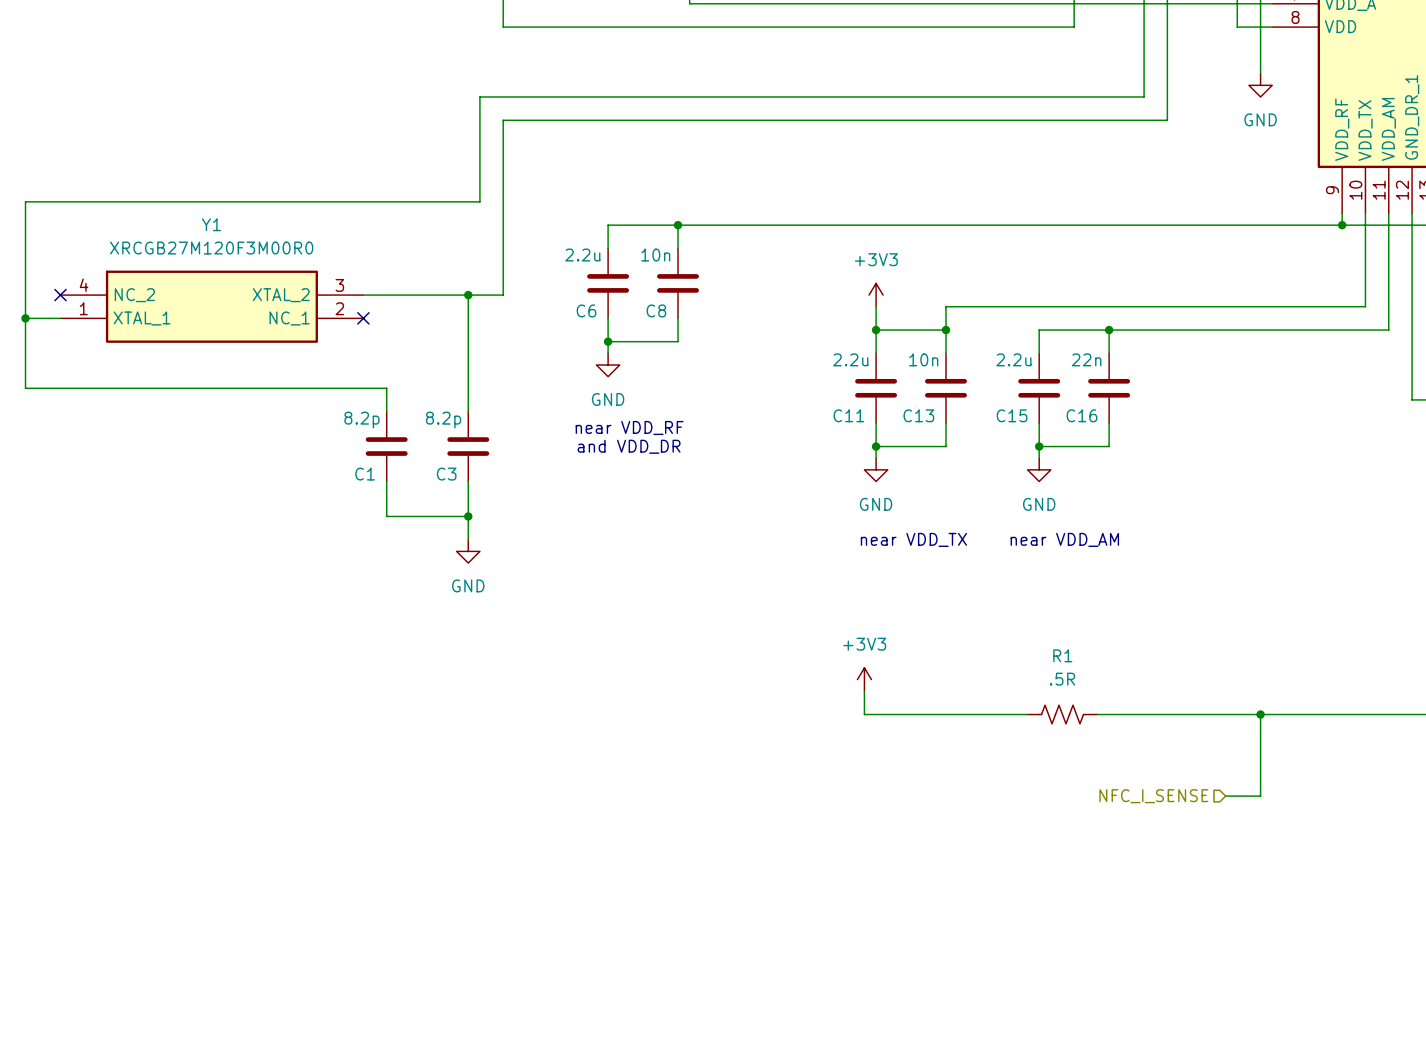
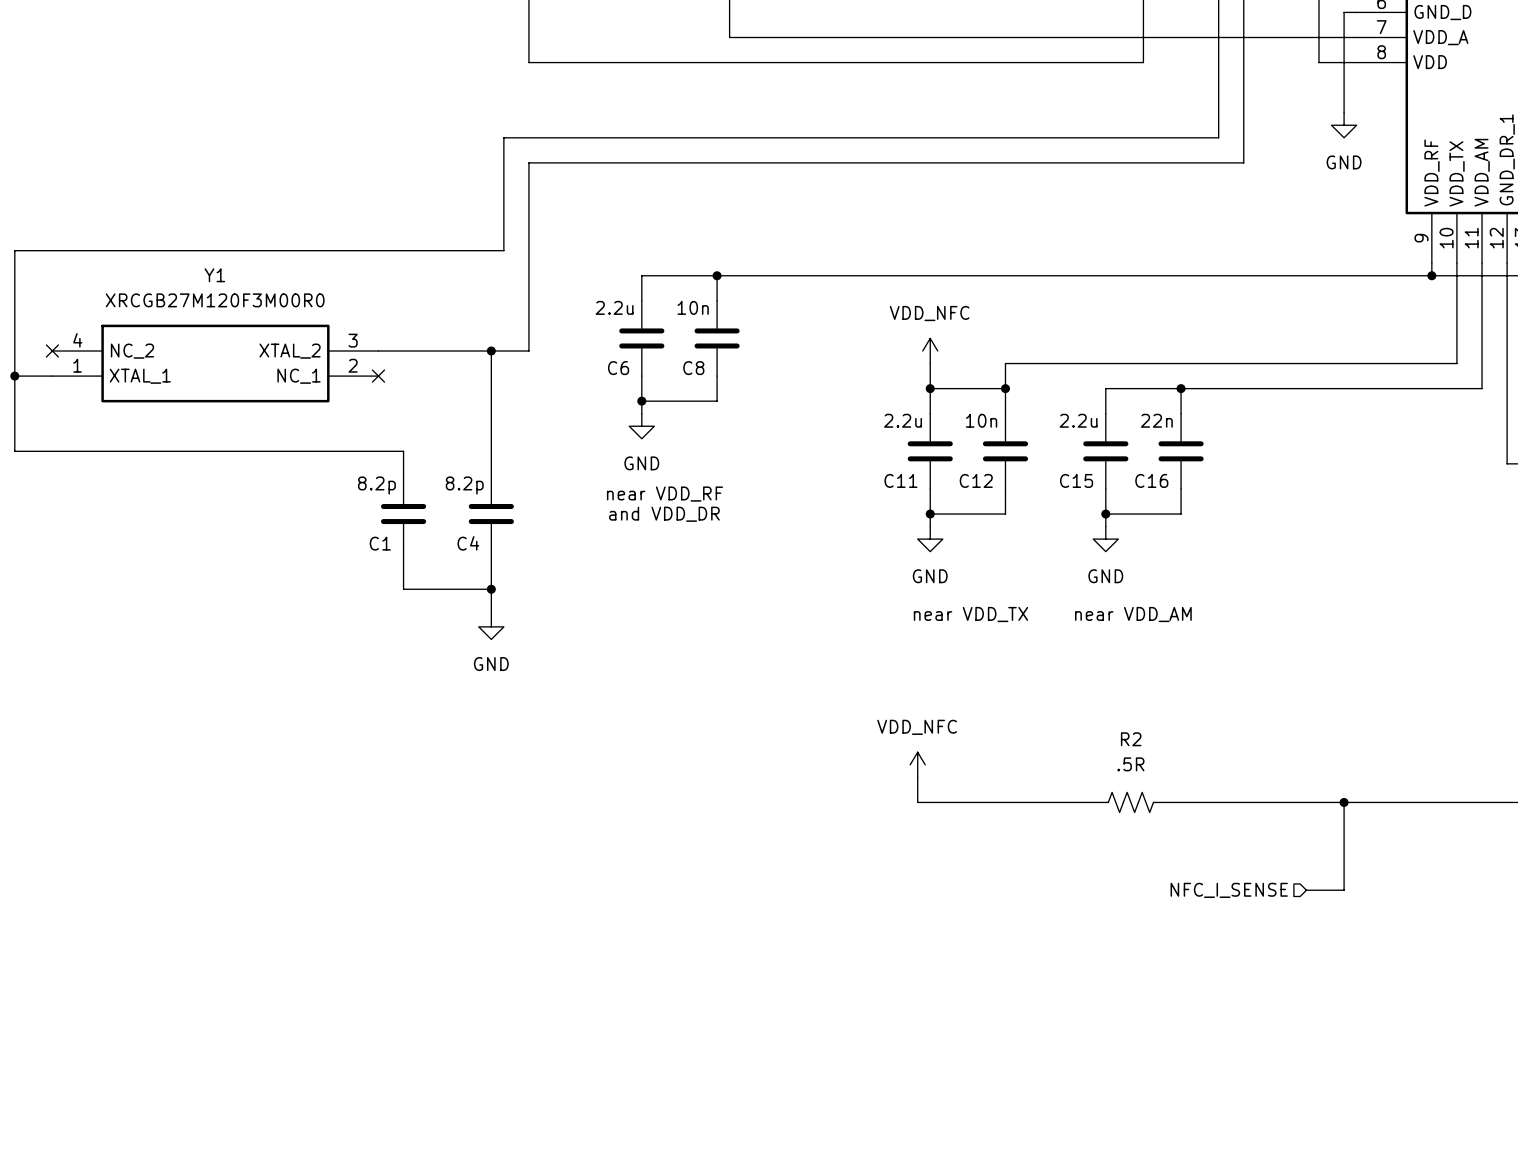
power symbol: +3V3 (876, 295) -> VDD_NFC (930, 351)
C13 name: C13 (918, 415) -> C12 (976, 480)
C3 name: C3 (446, 474) -> C4 (468, 543)
R1 name: R1 (1062, 655) -> R2 (1131, 739)
power symbol: +3V3 (864, 679) -> VDD_NFC (917, 764)

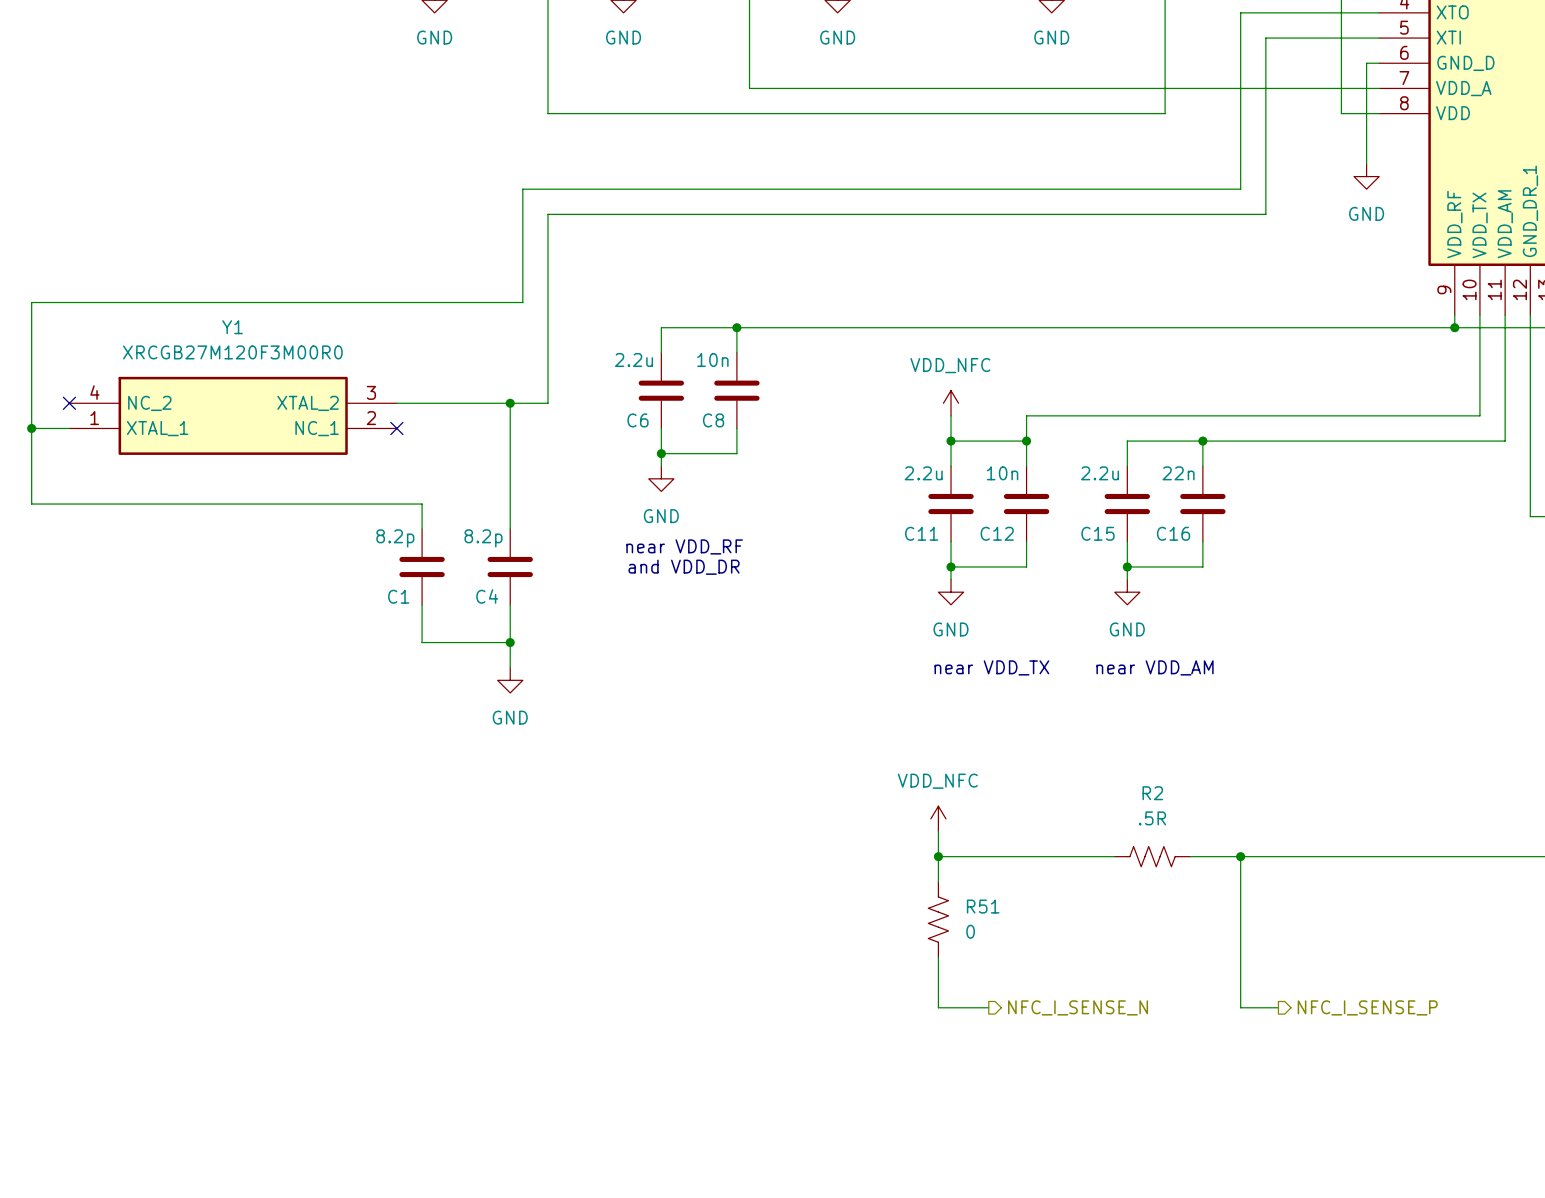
wire: none -> (938, 856) (938, 881)
junction: none -> (938, 856)
wire: none -> (1240, 856) (1240, 1007) (1278, 1007)
junction: none -> (1240, 856)
wire: (1344, 802) (1344, 890) (1306, 890) -> none
junction: (1344, 802) -> none
R51: none -> 0 (938, 919)
hierarchical label: NFC_I_SENSE (1229, 890) -> none
wire: none -> (938, 957) (938, 1007) (988, 1007)
hierarchical label: none -> NFC_I_SENSE_N (1078, 1007)
hierarchical label: none -> NFC_I_SENSE_P (1367, 1007)

